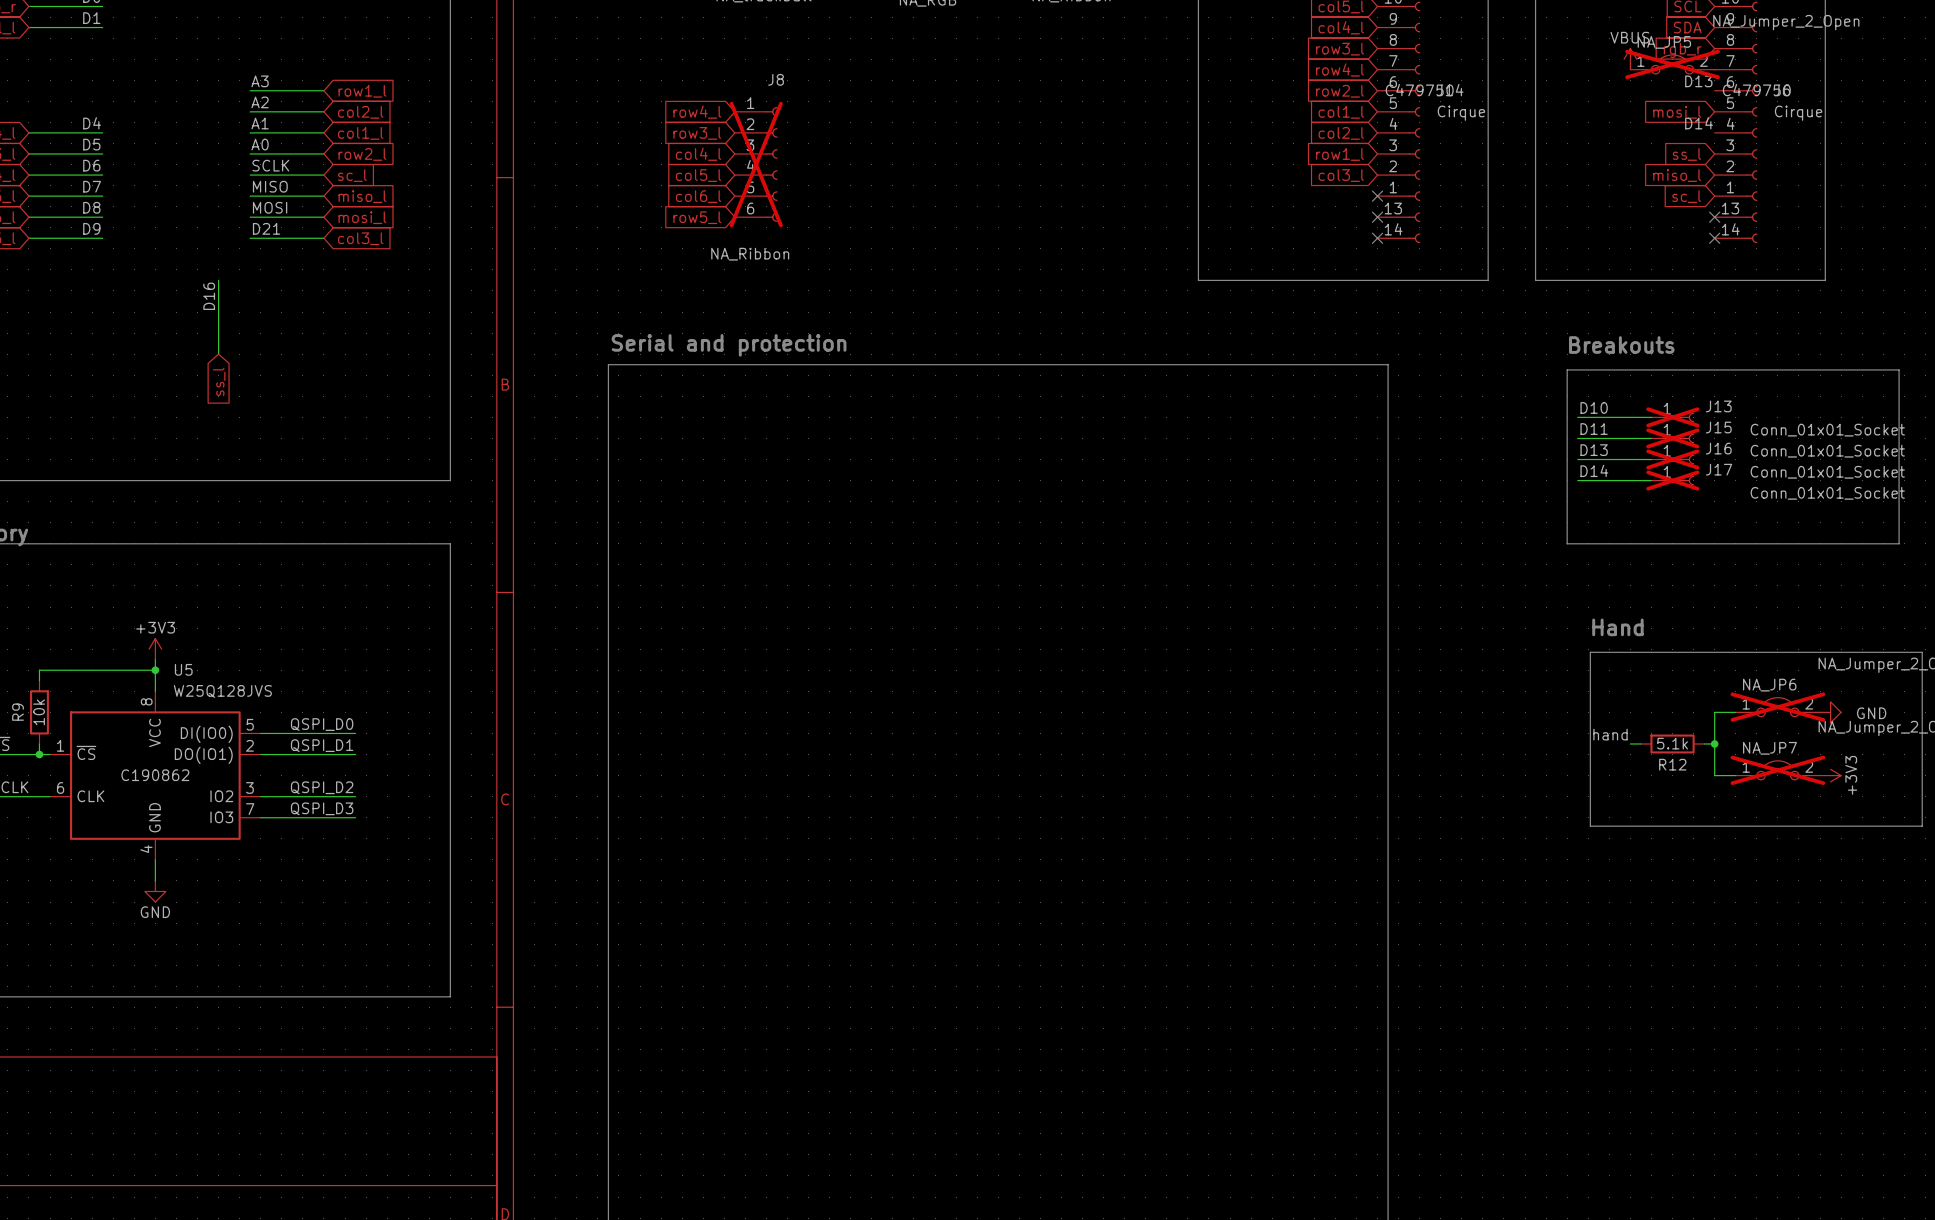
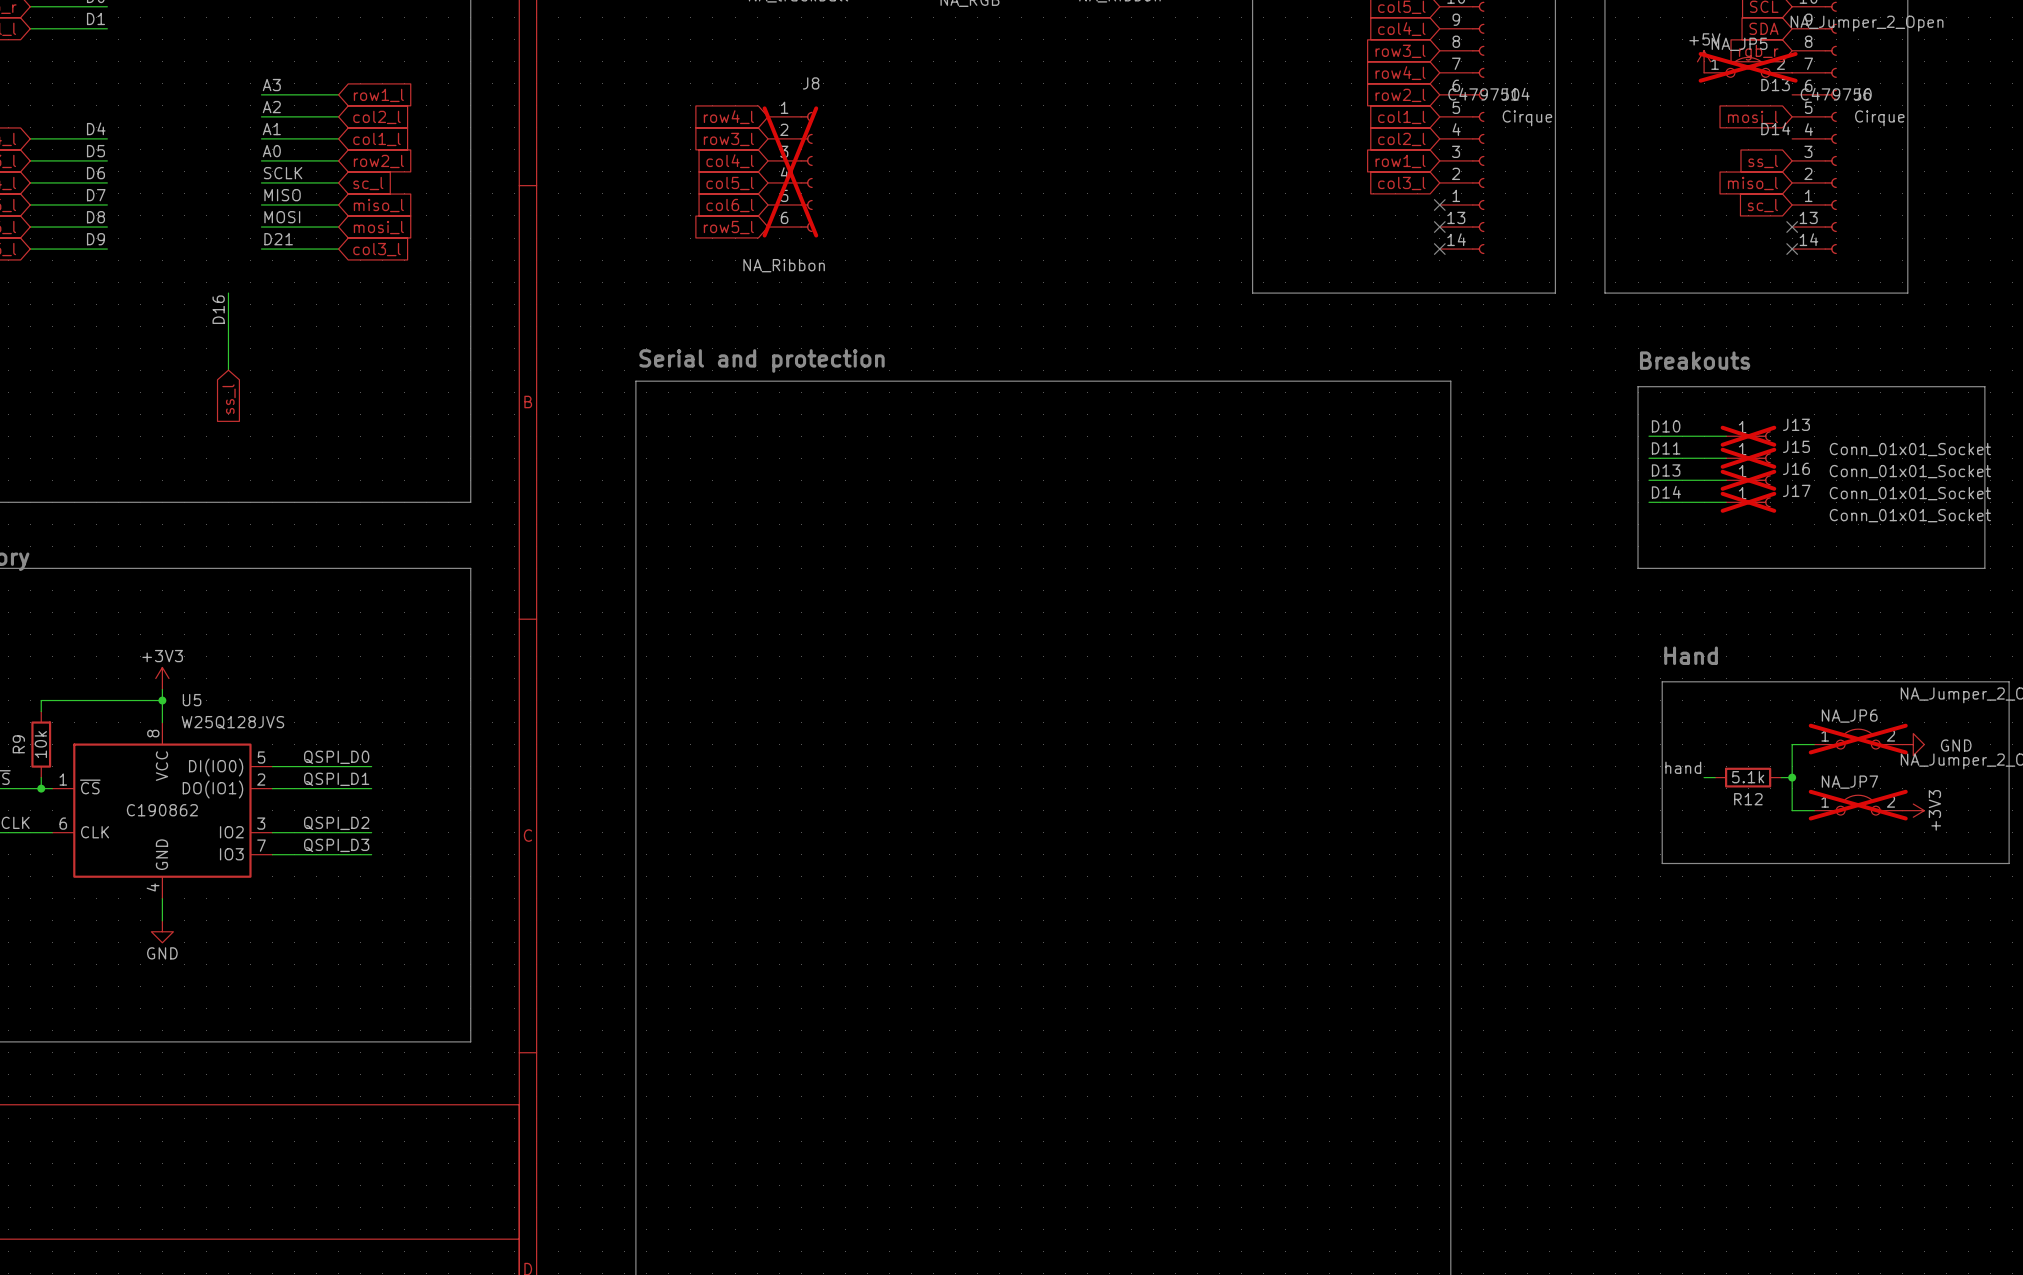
power symbol: VBUS (1630, 59) -> +5V (1704, 61)

